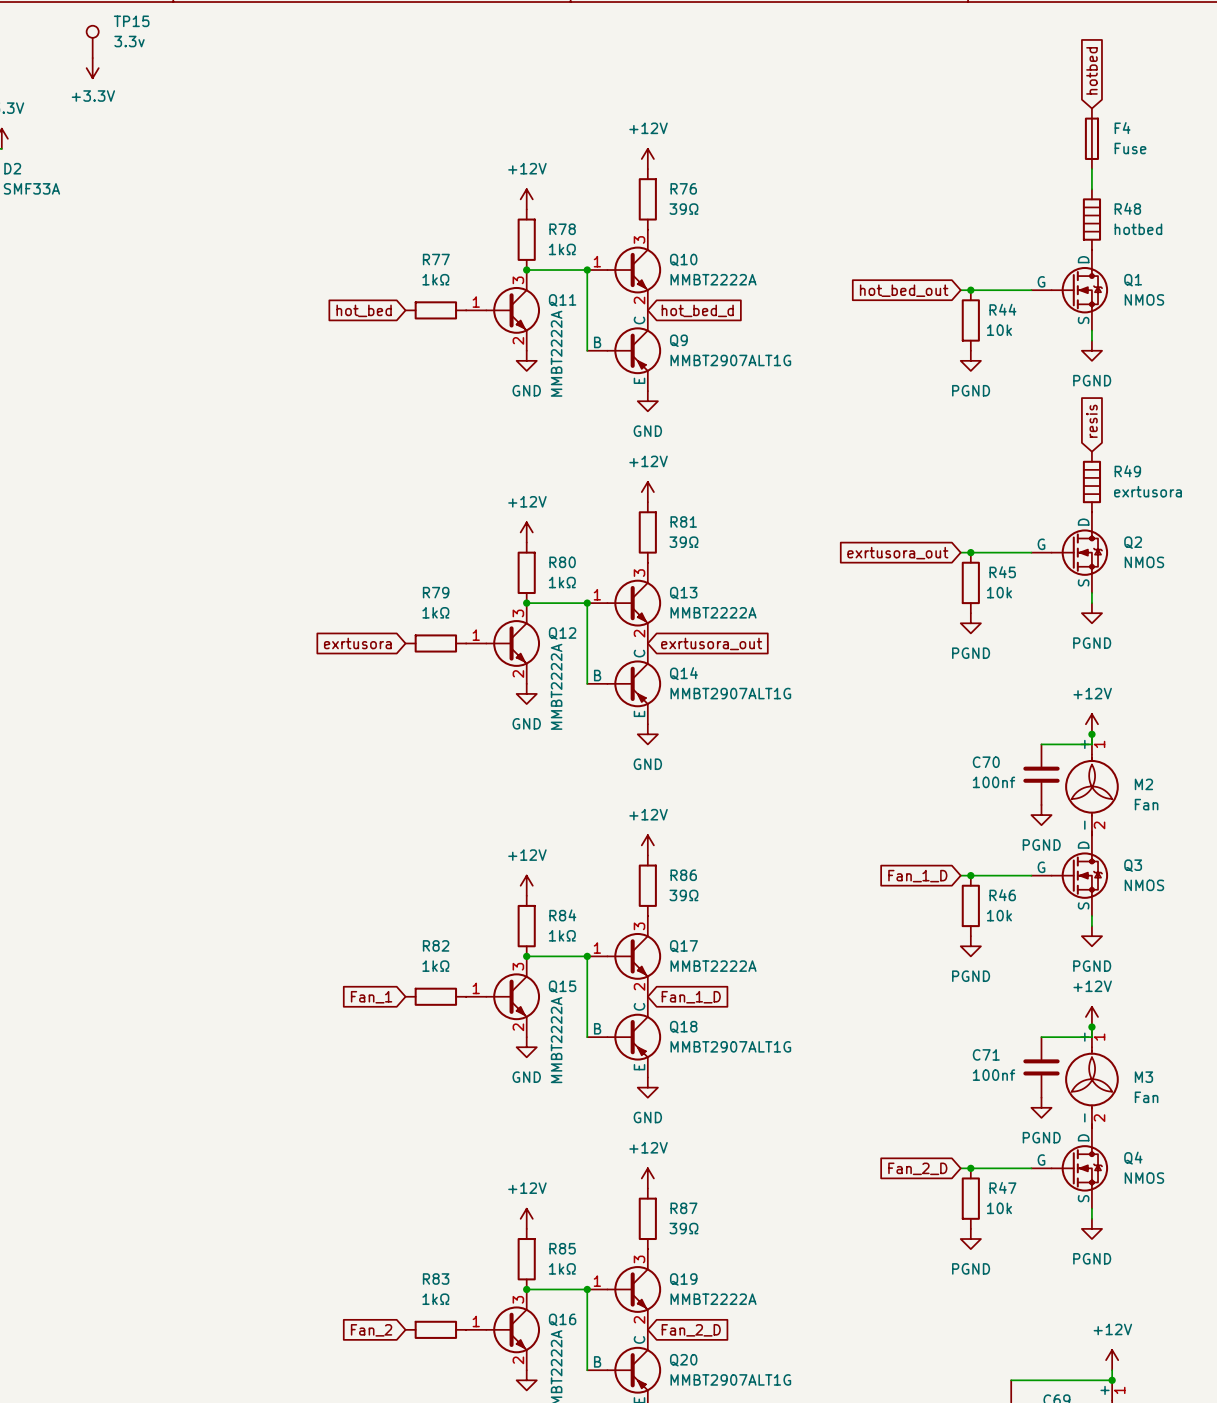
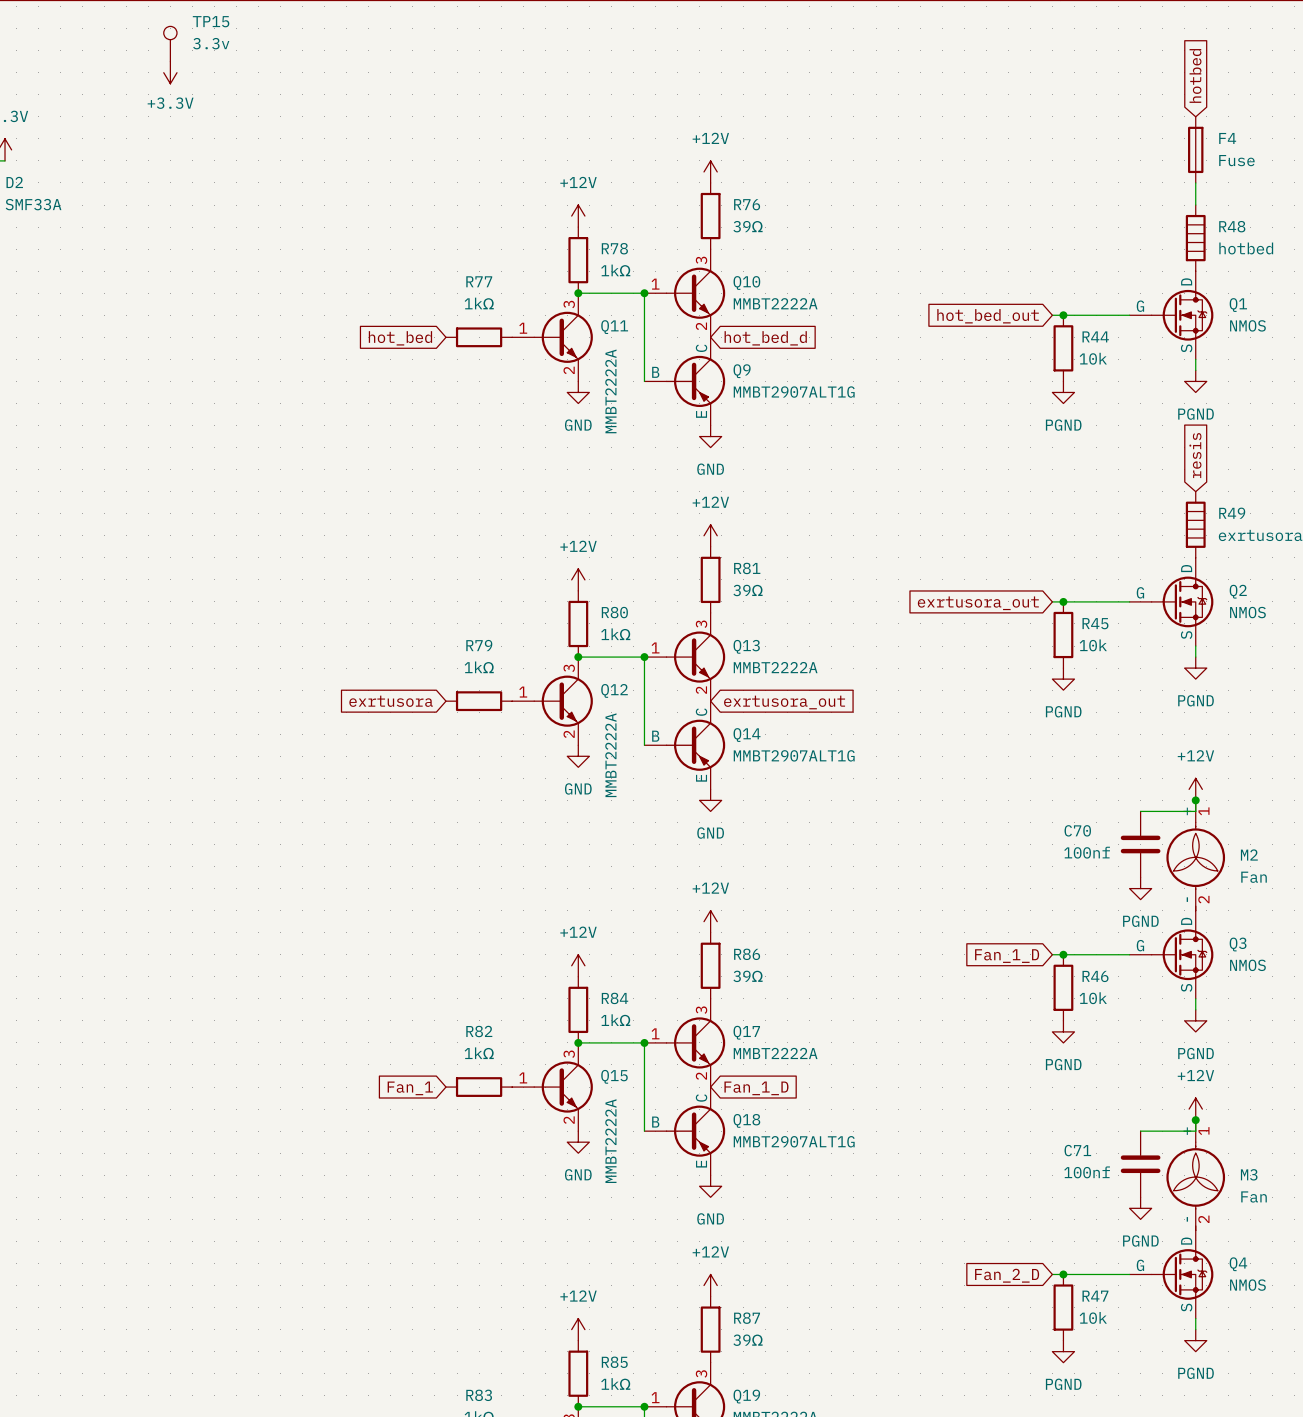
TP15 position: (92, 41) -> (170, 44)
power symbol position: +3.3V (92, 68) -> +3.3V (170, 72)

